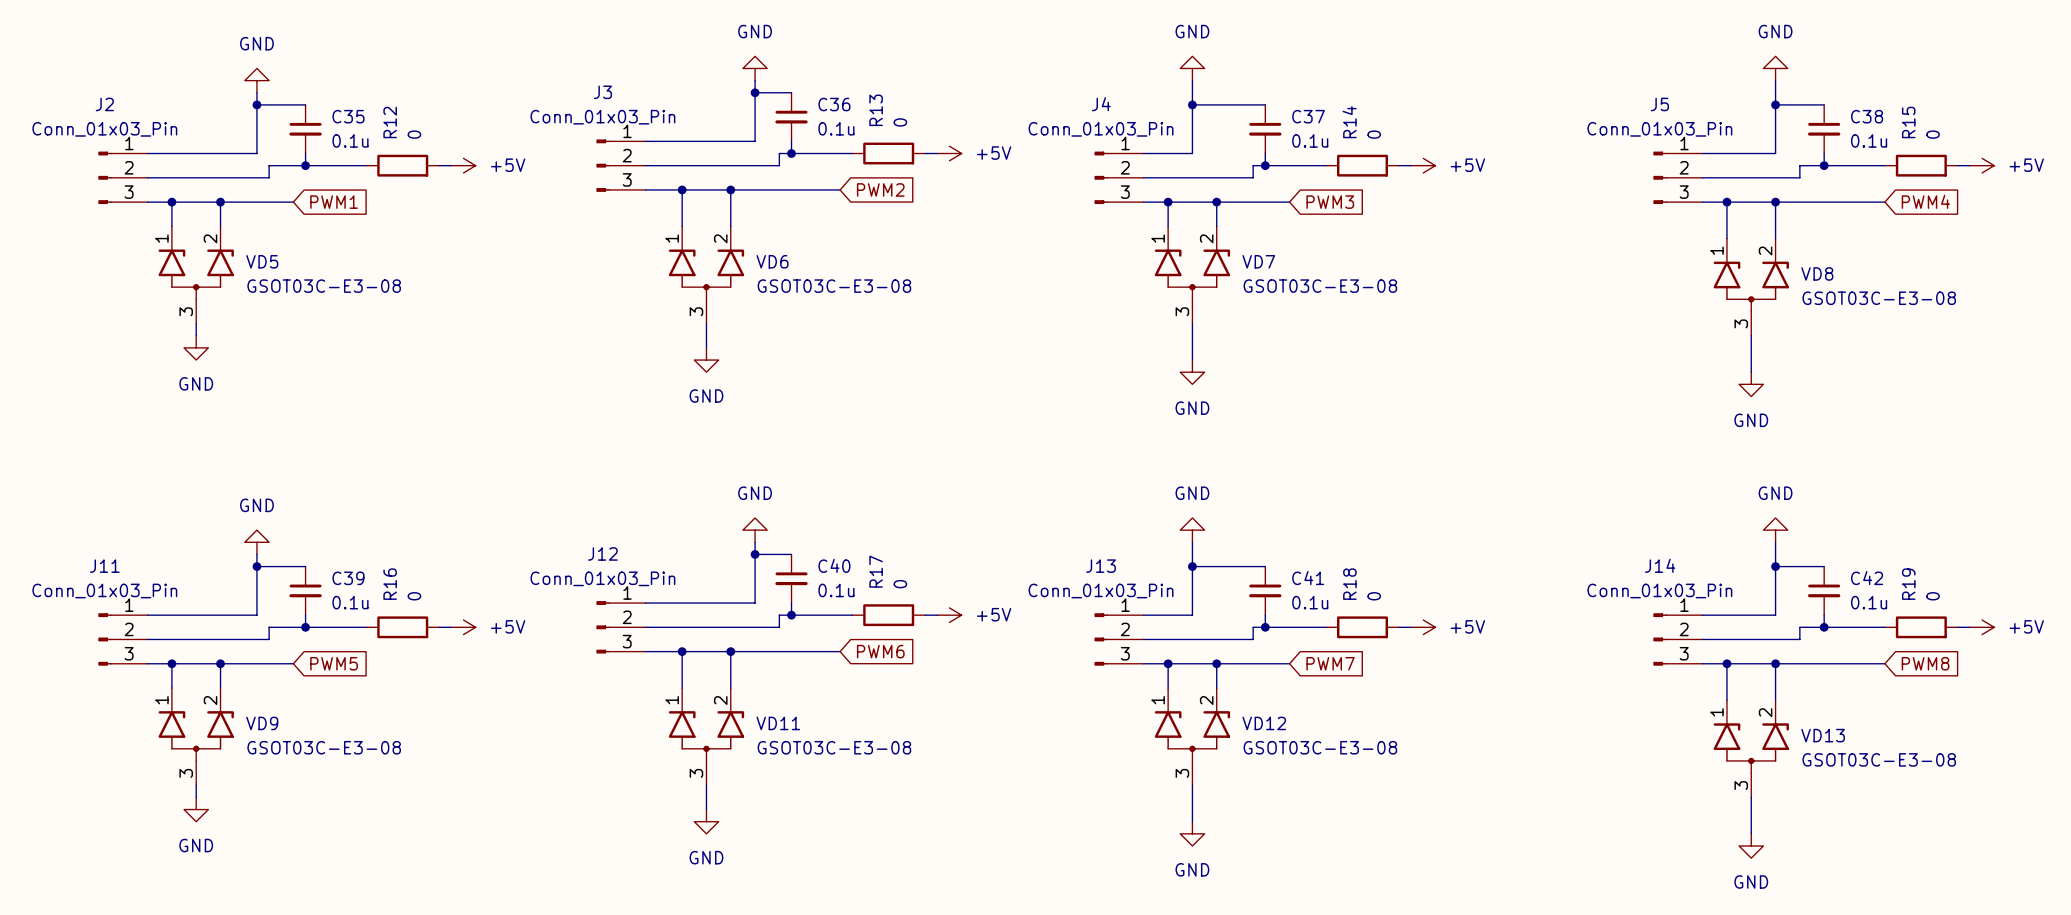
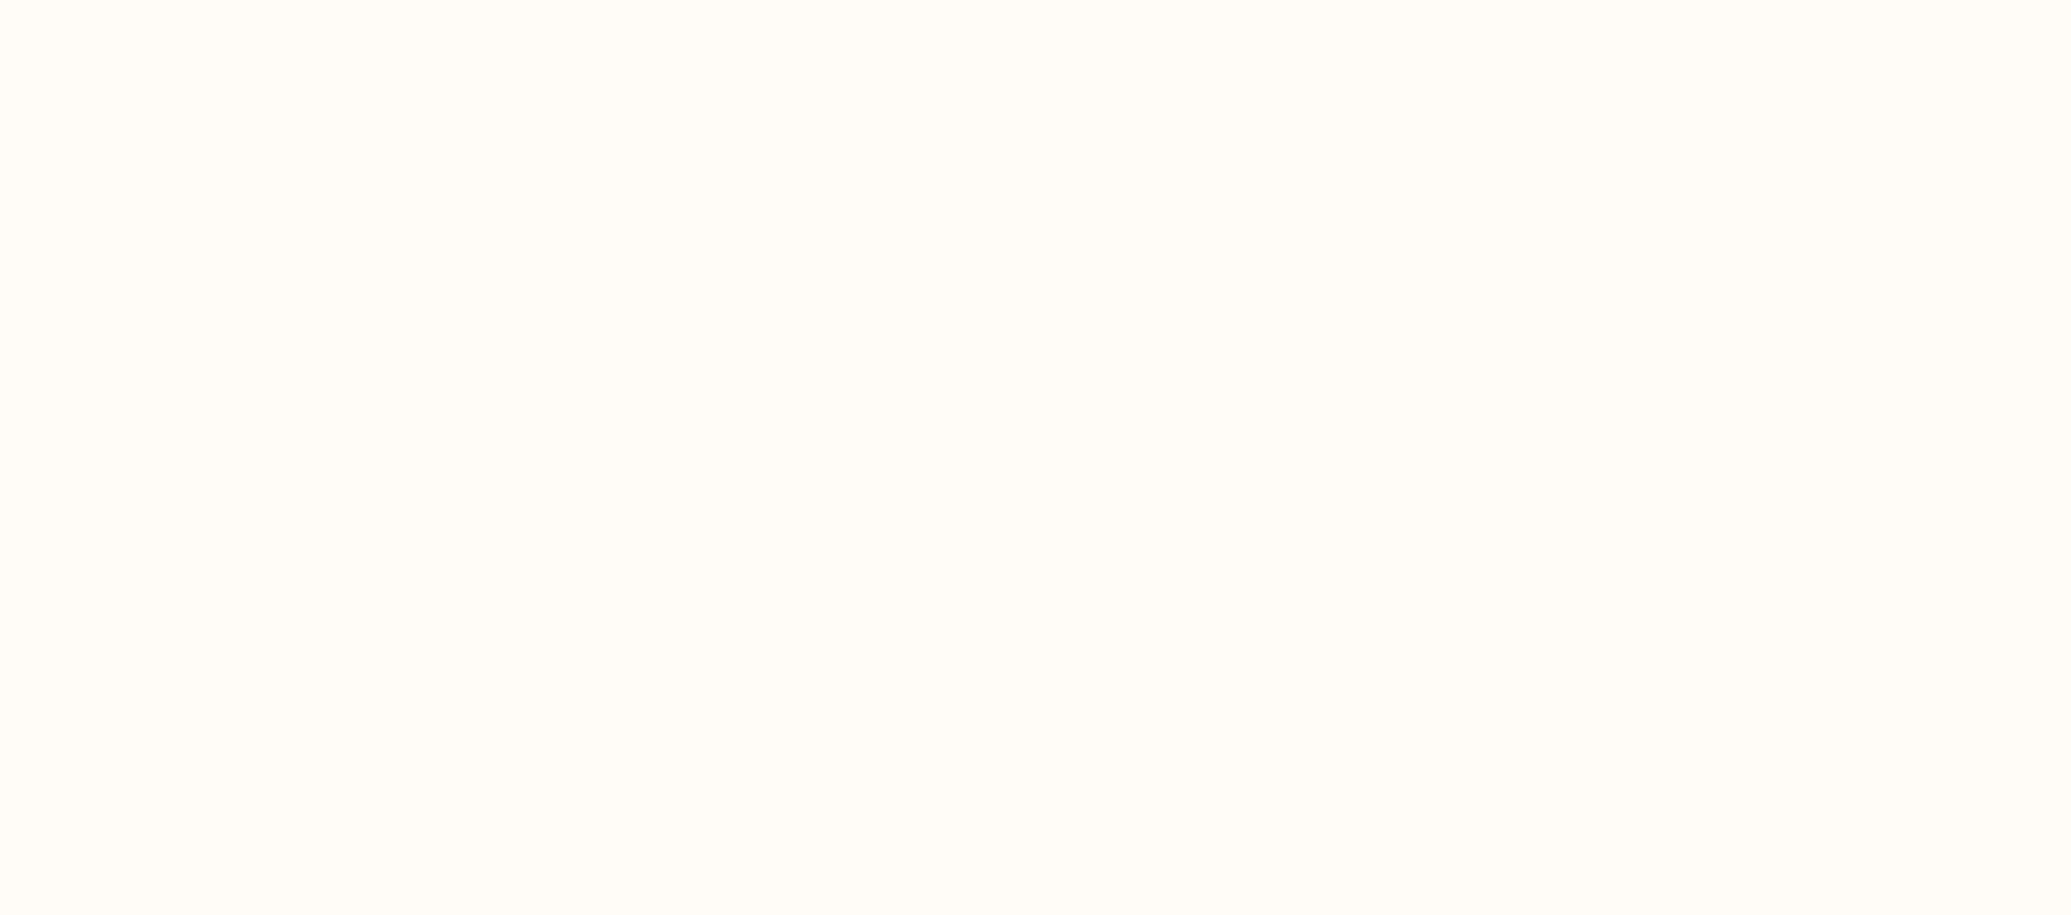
power symbol: GND (755, 68) -> none
power symbol: GND (1192, 68) -> none
power symbol: GND (1775, 68) -> none
power symbol: GND (256, 80) -> none
wire: (755, 80) (755, 141) (645, 141) -> none
wire: (1192, 80) (1192, 153) (1143, 153) -> none
wire: (1775, 80) (1775, 153) (1702, 153) -> none
wire: (256, 92) (256, 153) (147, 153) -> none
wire: (755, 92) (791, 92) -> none
junction: (755, 92) -> none
wire: (256, 104) (305, 104) -> none
junction: (256, 104) -> none
wire: (1192, 104) (1265, 104) -> none
junction: (1192, 104) -> none
wire: (1775, 104) (1824, 104) -> none
junction: (1775, 104) -> none
C36: 0.1u (791, 117) -> none
C35: 0.1u (305, 129) -> none
C37: 0.1u (1265, 129) -> none
C38: 0.1u (1824, 129) -> none
wire: (791, 141) (791, 153) -> none
wire: (305, 153) (305, 165) -> none
junction: (791, 153) -> none
wire: (852, 153) (779, 153) (779, 165) (645, 165) -> none
R13: 0 (888, 153) -> none
wire: (925, 153) (937, 153) -> none
power symbol: +5V (949, 153) -> none
wire: (1265, 153) (1265, 165) -> none
wire: (1824, 153) (1824, 165) -> none
junction: (305, 165) -> none
wire: (366, 165) (269, 165) (269, 177) (147, 177) -> none
R12: 0 (402, 165) -> none
wire: (439, 165) (451, 165) -> none
power symbol: +5V (463, 165) -> none
J3: Conn_01x03_Pin (621, 165) -> none
junction: (1265, 165) -> none
wire: (1326, 165) (1253, 165) (1253, 177) (1143, 177) -> none
R14: 0 (1362, 165) -> none
wire: (1398, 165) (1411, 165) -> none
power symbol: +5V (1423, 165) -> none
junction: (1824, 165) -> none
wire: (1884, 165) (1799, 165) (1799, 177) (1702, 177) -> none
R15: 0 (1921, 165) -> none
wire: (1957, 165) (1969, 165) -> none
power symbol: +5V (1982, 165) -> none
J2: Conn_01x03_Pin (122, 177) -> none
J4: Conn_01x03_Pin (1119, 177) -> none
J5: Conn_01x03_Pin (1678, 177) -> none
wire: (645, 189) (840, 189) -> none
wire: (682, 189) (682, 226) -> none
junction: (682, 189) -> none
wire: (730, 189) (730, 226) -> none
junction: (730, 189) -> none
global label: PWM2 (880, 189) -> none
global label: PWM4 (1925, 201) -> none
wire: (147, 202) (293, 202) -> none
wire: (171, 202) (171, 226) -> none
junction: (171, 202) -> none
wire: (220, 202) (220, 226) -> none
junction: (220, 202) -> none
global label: PWM1 (334, 202) -> none
wire: (1143, 202) (1289, 202) -> none
wire: (1168, 202) (1168, 226) -> none
junction: (1168, 202) -> none
wire: (1216, 202) (1216, 226) -> none
junction: (1216, 202) -> none
global label: PWM3 (1330, 202) -> none
wire: (1702, 202) (1884, 202) -> none
wire: (1726, 202) (1726, 238) -> none
junction: (1726, 202) -> none
wire: (1775, 202) (1775, 238) -> none
junction: (1775, 202) -> none
VD5: GSOT03C-E3-08 (196, 275) -> none
VD6: GSOT03C-E3-08 (706, 275) -> none
VD7: GSOT03C-E3-08 (1192, 275) -> none
VD8: GSOT03C-E3-08 (1751, 287) -> none
wire: (196, 323) (196, 335) -> none
wire: (706, 323) (706, 347) -> none
wire: (1192, 323) (1192, 360) -> none
wire: (1751, 335) (1751, 372) -> none
power symbol: GND (196, 347) -> none
power symbol: GND (706, 360) -> none
power symbol: GND (1192, 372) -> none
power symbol: GND (1751, 384) -> none
power symbol: GND (755, 530) -> none
power symbol: GND (1192, 530) -> none
power symbol: GND (1775, 530) -> none
power symbol: GND (256, 542) -> none
wire: (755, 542) (755, 603) (645, 603) -> none
wire: (1192, 542) (1192, 615) (1143, 615) -> none
wire: (1775, 542) (1775, 615) (1702, 615) -> none
wire: (256, 554) (256, 615) (147, 615) -> none
wire: (755, 554) (791, 554) -> none
junction: (755, 554) -> none
wire: (256, 566) (305, 566) -> none
junction: (256, 566) -> none
wire: (1192, 566) (1265, 566) -> none
junction: (1192, 566) -> none
wire: (1775, 566) (1824, 566) -> none
junction: (1775, 566) -> none
C40: 0.1u (791, 578) -> none
C39: 0.1u (305, 590) -> none
C41: 0.1u (1265, 590) -> none
C42: 0.1u (1824, 590) -> none
wire: (791, 603) (791, 615) -> none
wire: (305, 615) (305, 627) -> none
junction: (791, 615) -> none
wire: (852, 615) (779, 615) (779, 627) (645, 627) -> none
R17: 0 (888, 615) -> none
wire: (925, 615) (937, 615) -> none
power symbol: +5V (949, 615) -> none
wire: (1265, 615) (1265, 627) -> none
wire: (1824, 615) (1824, 627) -> none
junction: (305, 627) -> none
wire: (366, 627) (269, 627) (269, 639) (147, 639) -> none
R16: 0 (402, 627) -> none
wire: (439, 627) (451, 627) -> none
power symbol: +5V (463, 627) -> none
J12: Conn_01x03_Pin (621, 627) -> none
junction: (1265, 627) -> none
wire: (1326, 627) (1253, 627) (1253, 639) (1143, 639) -> none
R18: 0 (1362, 627) -> none
wire: (1398, 627) (1411, 627) -> none
power symbol: +5V (1423, 627) -> none
junction: (1824, 627) -> none
wire: (1884, 627) (1799, 627) (1799, 639) (1702, 639) -> none
R19: 0 (1921, 627) -> none
wire: (1957, 627) (1969, 627) -> none
power symbol: +5V (1982, 627) -> none
J11: Conn_01x03_Pin (122, 639) -> none
J13: Conn_01x03_Pin (1119, 639) -> none
J14: Conn_01x03_Pin (1678, 639) -> none
wire: (645, 651) (840, 651) -> none
wire: (682, 651) (682, 688) -> none
junction: (682, 651) -> none
wire: (730, 651) (730, 688) -> none
junction: (730, 651) -> none
global label: PWM6 (880, 651) -> none
wire: (147, 663) (293, 663) -> none
wire: (171, 663) (171, 688) -> none
junction: (171, 663) -> none
wire: (220, 663) (220, 688) -> none
junction: (220, 663) -> none
global label: PWM5 (334, 663) -> none
wire: (1143, 663) (1289, 663) -> none
wire: (1168, 663) (1168, 688) -> none
junction: (1168, 663) -> none
wire: (1216, 663) (1216, 688) -> none
junction: (1216, 663) -> none
global label: PWM7 (1330, 663) -> none
wire: (1702, 663) (1884, 663) -> none
wire: (1726, 663) (1726, 700) -> none
junction: (1726, 663) -> none
wire: (1775, 663) (1775, 700) -> none
junction: (1775, 663) -> none
global label: PWM8 (1925, 663) -> none
VD9: GSOT03C-E3-08 (196, 736) -> none
VD11: GSOT03C-E3-08 (706, 736) -> none
VD12: GSOT03C-E3-08 (1192, 736) -> none
VD13: GSOT03C-E3-08 (1751, 748) -> none
wire: (196, 785) (196, 797) -> none
wire: (706, 785) (706, 809) -> none
wire: (1192, 785) (1192, 821) -> none
wire: (1751, 797) (1751, 833) -> none
power symbol: GND (196, 809) -> none
power symbol: GND (706, 821) -> none
power symbol: GND (1192, 833) -> none
power symbol: GND (1751, 846) -> none

